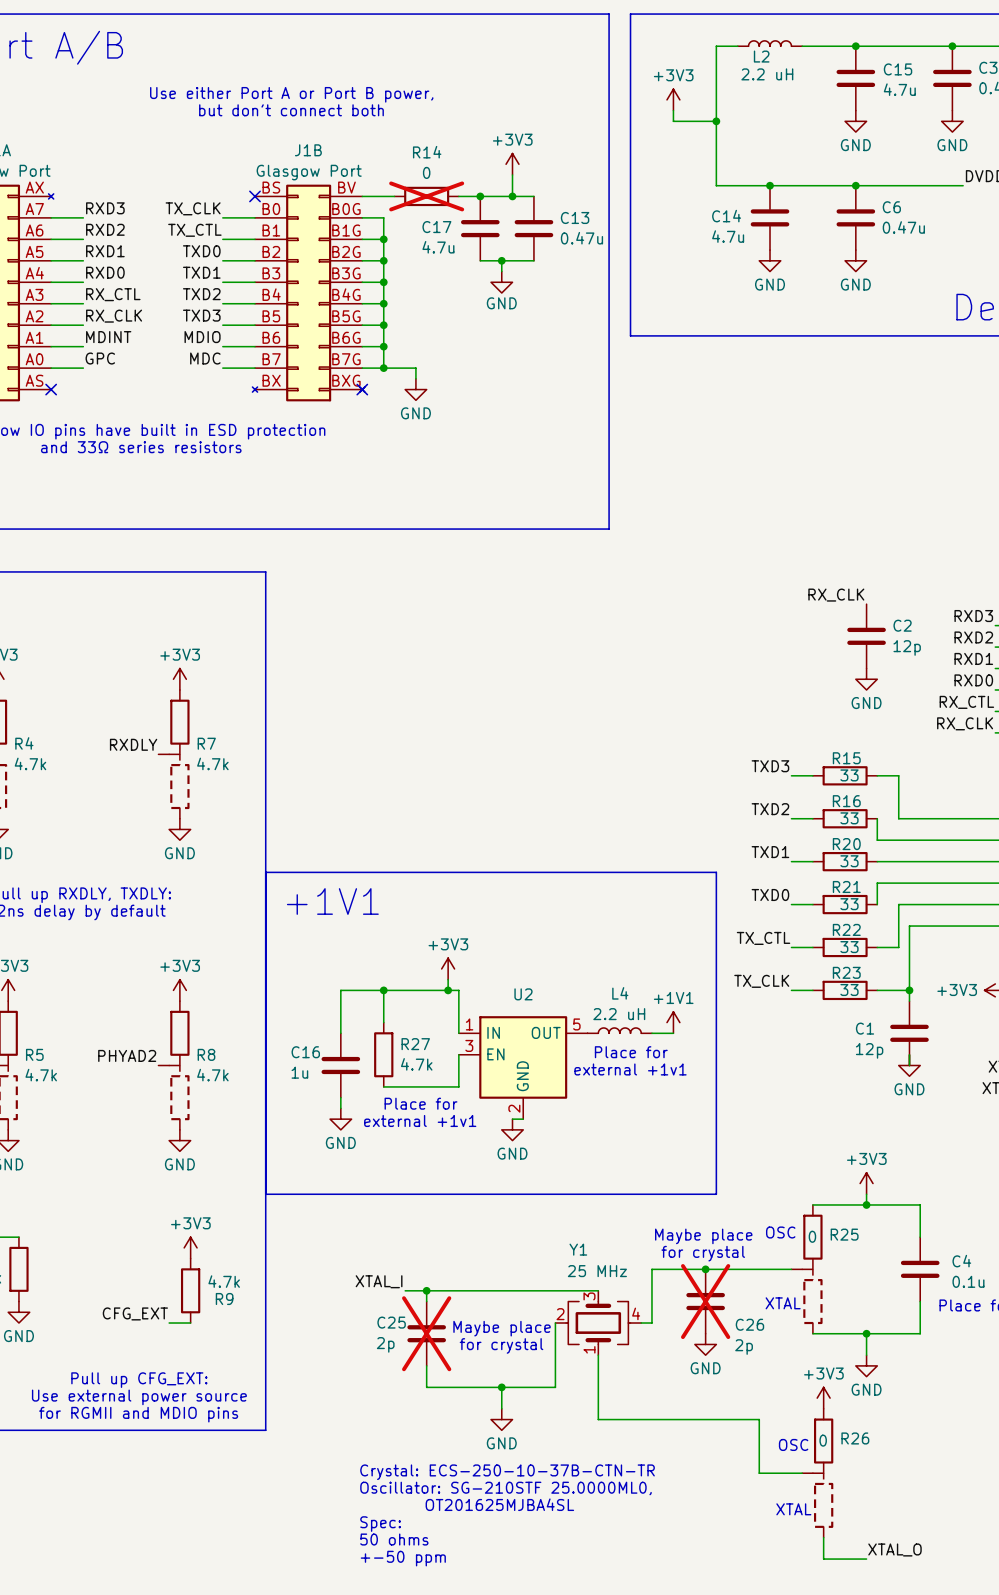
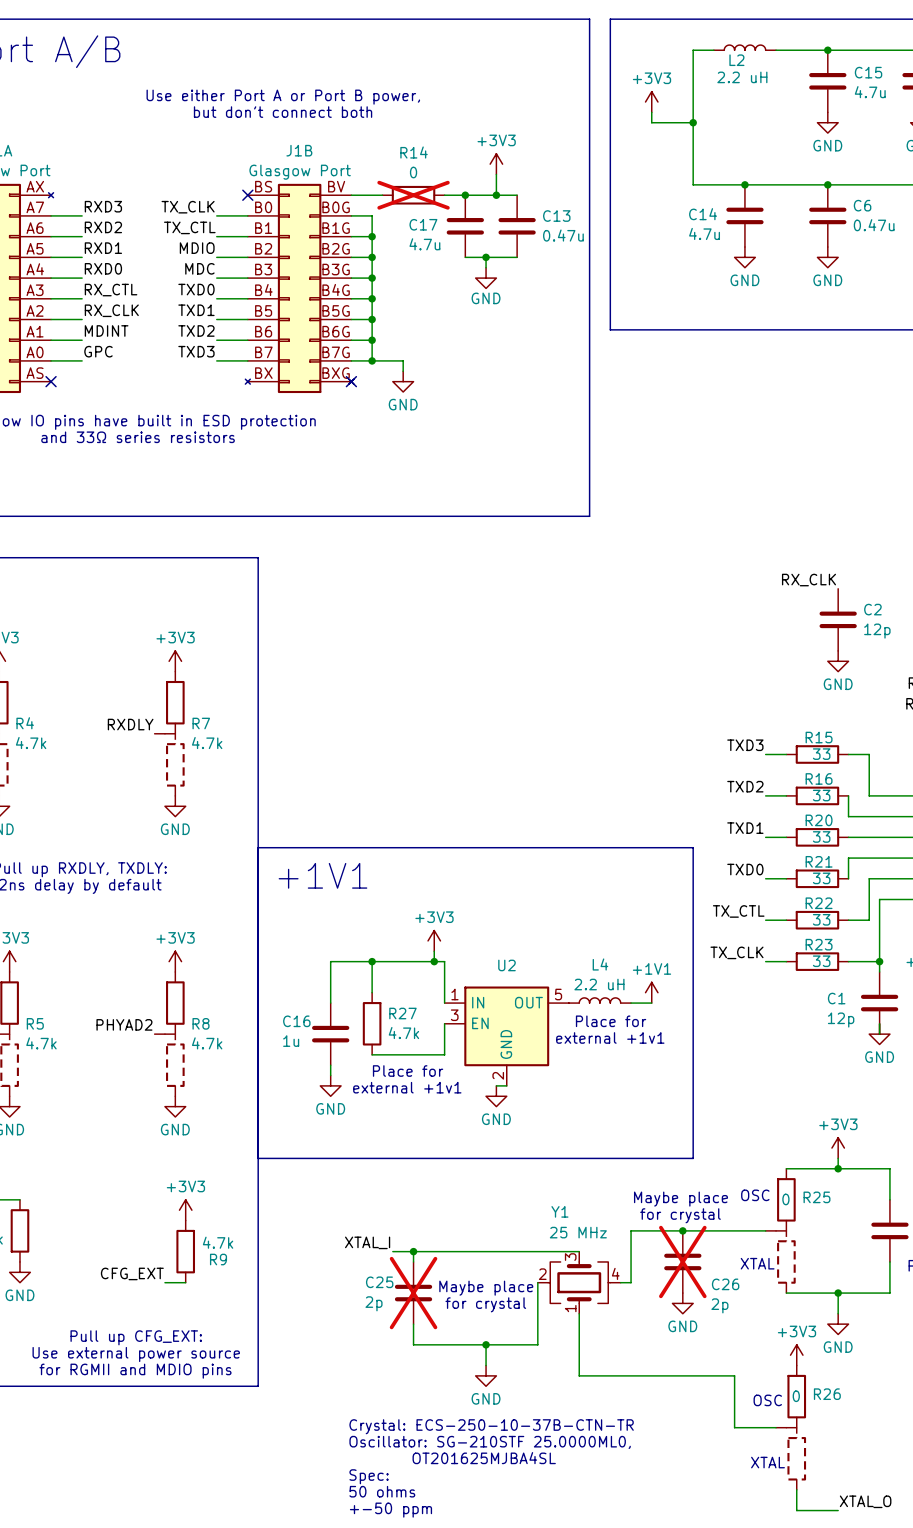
label: TXD0 (201, 251) -> MDIO (197, 248)
label: TXD1 (201, 272) -> MDC (199, 268)
label: TXD2 (201, 294) -> TXD0 (196, 289)
label: TXD3 (201, 315) -> TXD1 (196, 310)
label: MDIO (202, 337) -> TXD2 (196, 330)
label: MDC (205, 358) -> TXD3 (196, 351)

